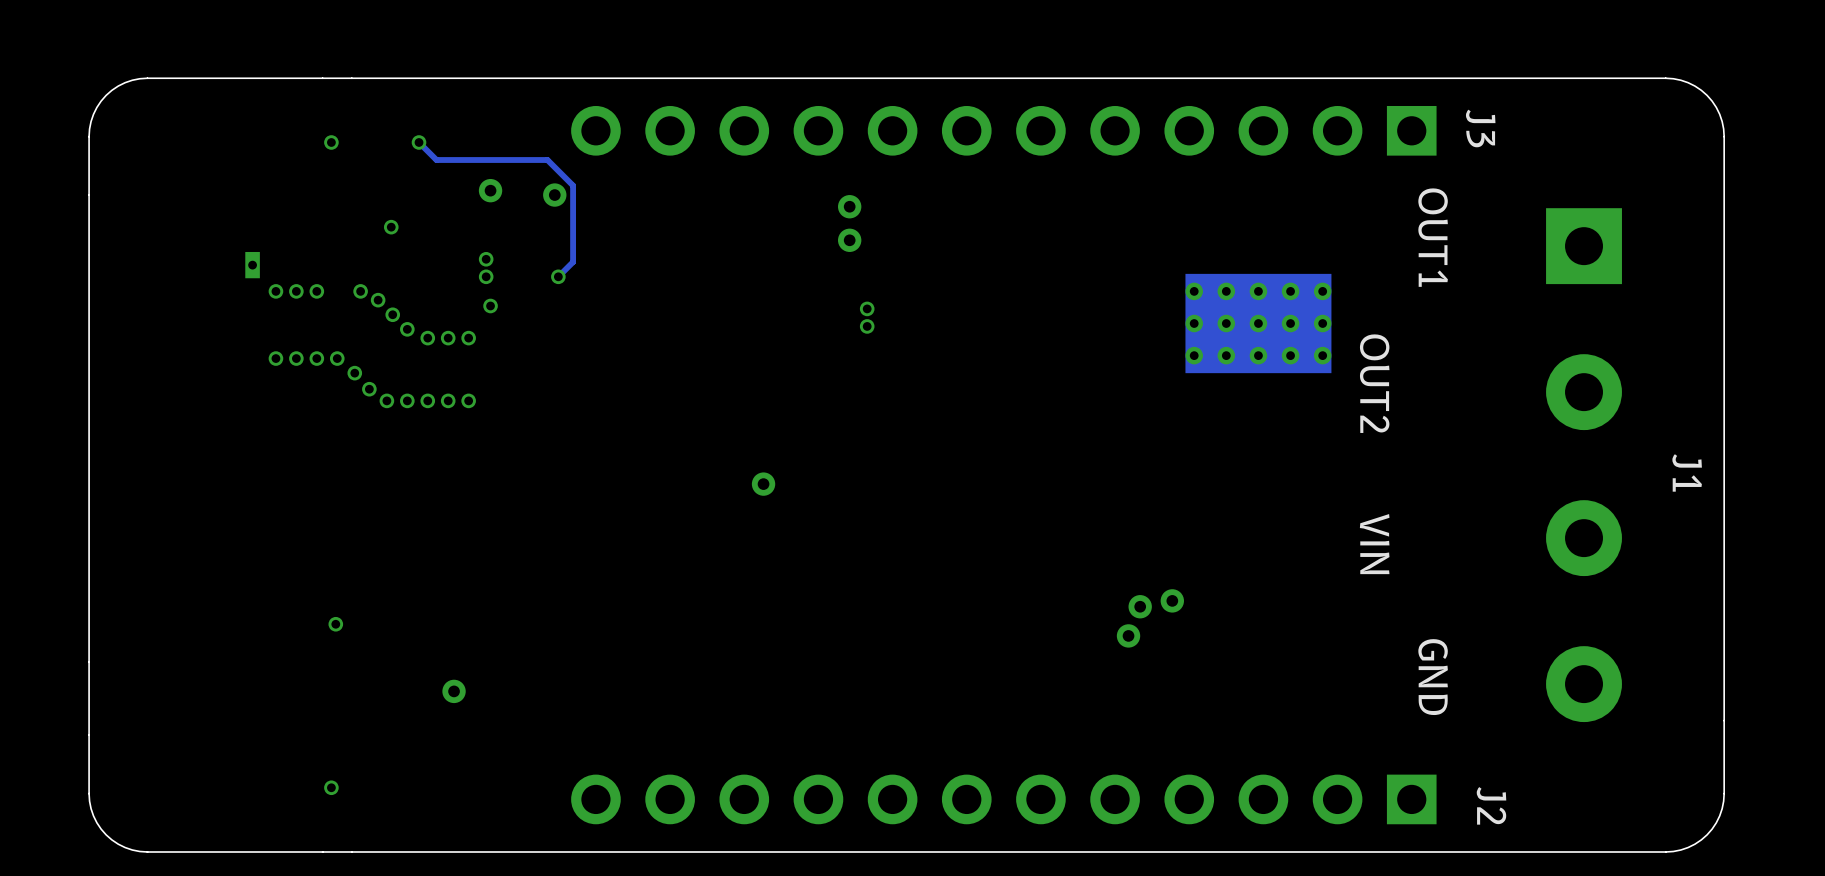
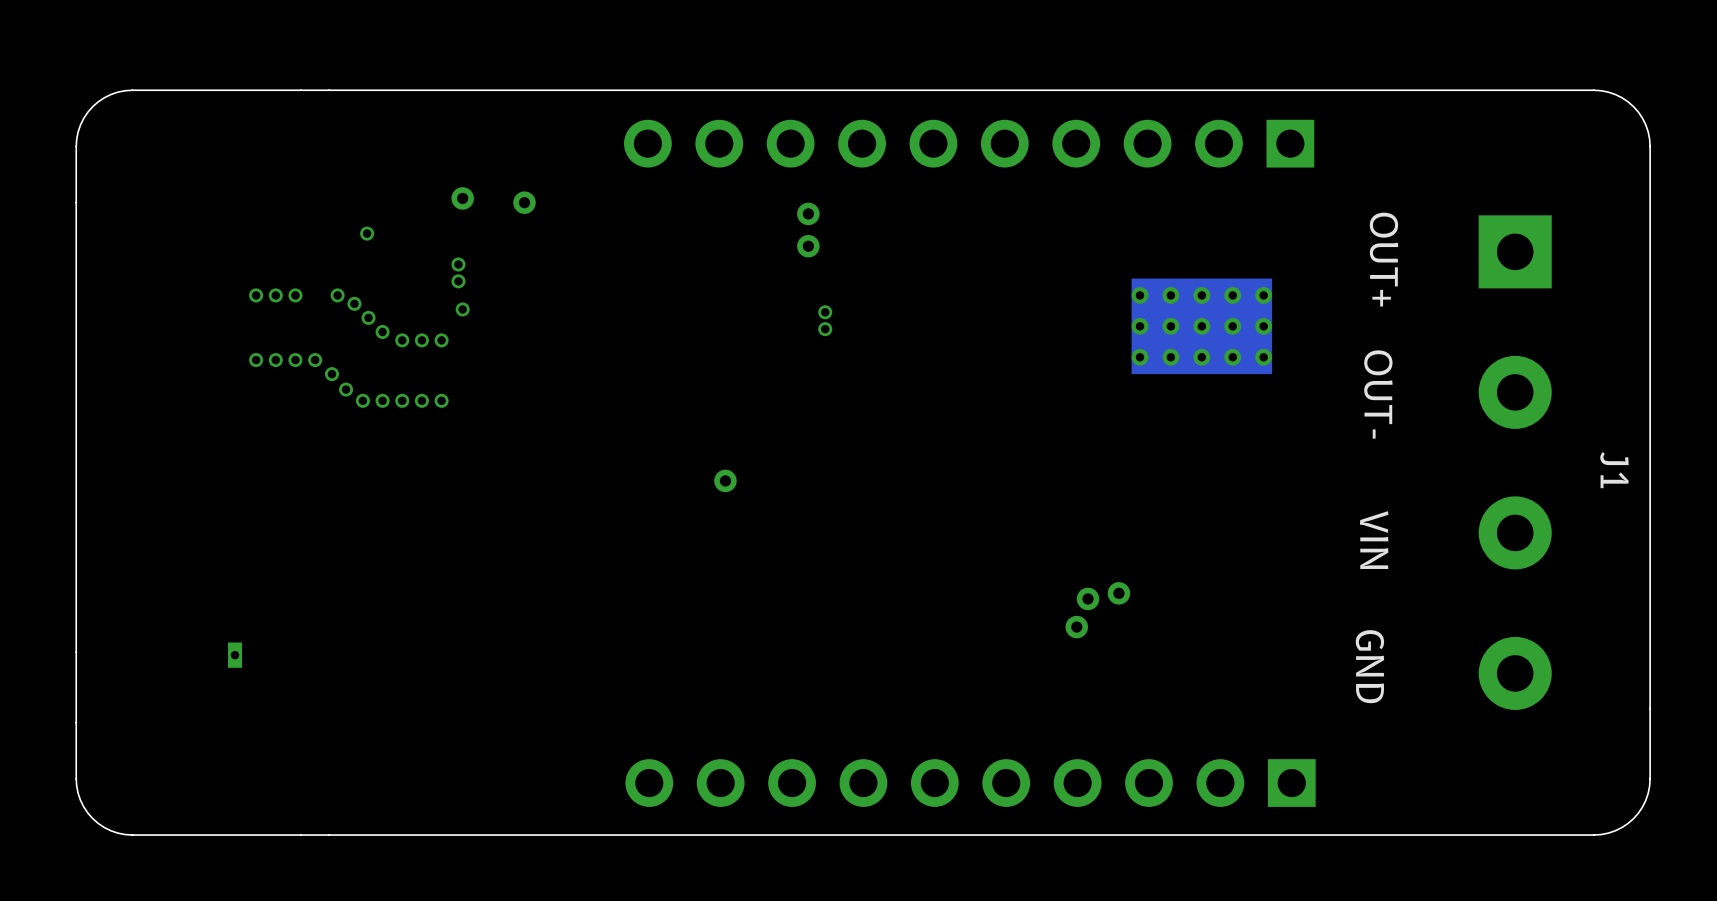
J3: (1003, 130) -> none
part: none -> (969, 143)
via: (331, 142) -> none
track: (419, 142) (436, 160) (547, 160) (573, 185) (573, 262) (558, 276) -> none
via: (419, 142) -> none
text: OUT1 (1433, 237) -> OUT+ (1384, 259)
part position: (252, 265) -> (235, 655)
via: (558, 276) -> none
text: OUT2 (1374, 383) -> none
text: none -> OUT- (1378, 394)
text position: VIN (1374, 544) -> VIN (1374, 540)
via: (335, 624) -> none
via: (454, 691) -> none
via: (331, 787) -> none
part: none -> (970, 783)
J2: (1003, 799) -> none

